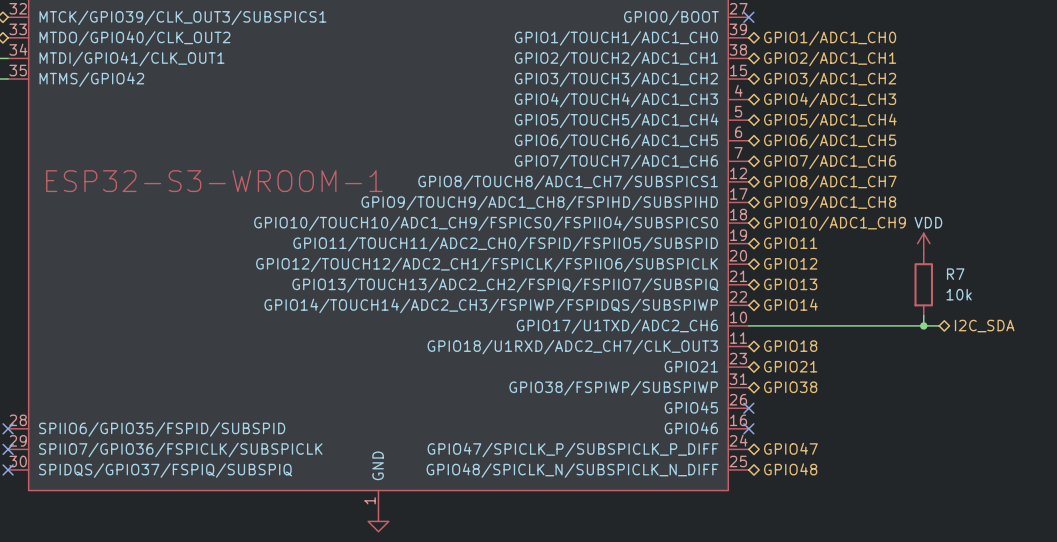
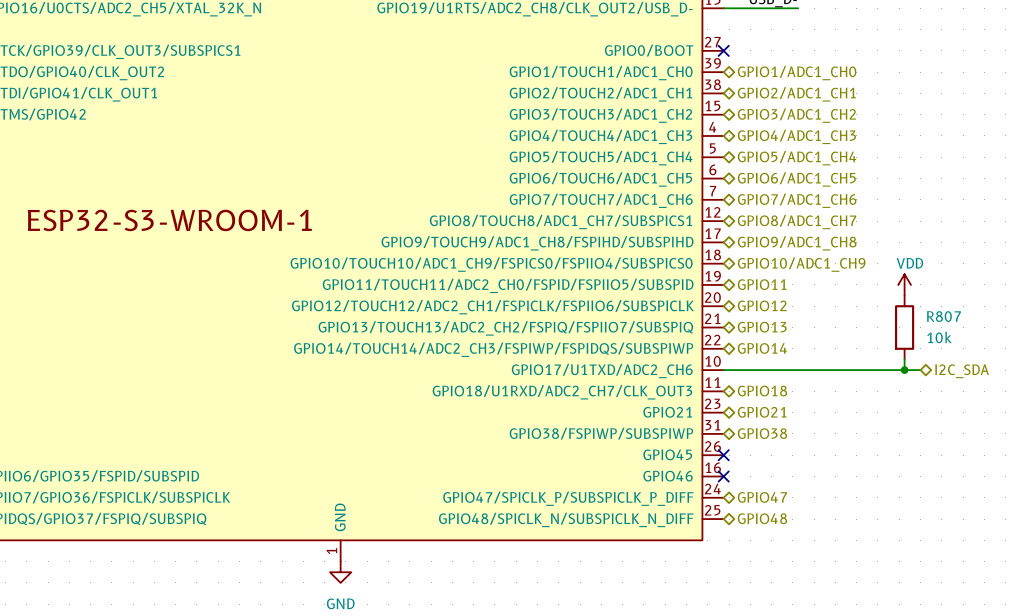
R7 name: R7 (955, 274) -> R807 (943, 316)

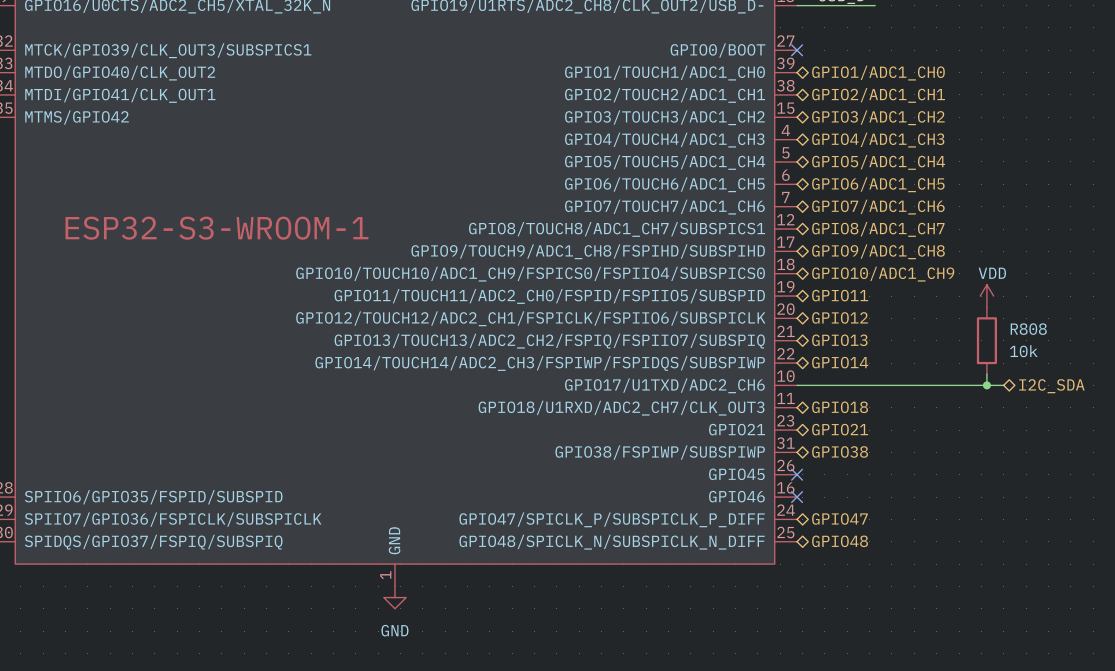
R807 name: R807 (943, 316) -> R808 (1028, 329)

